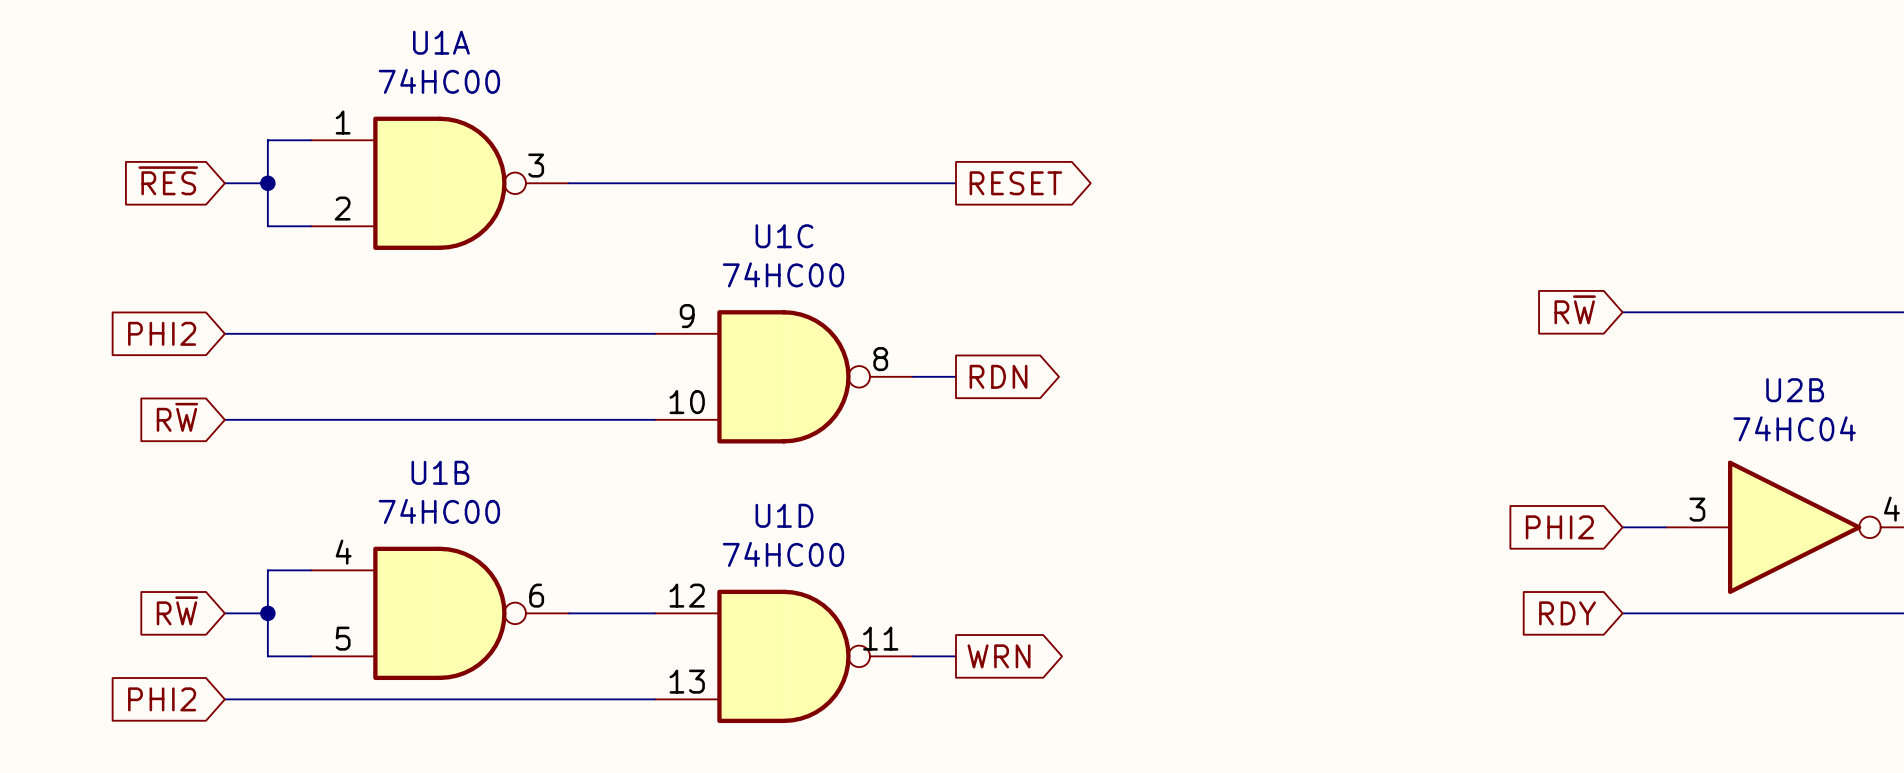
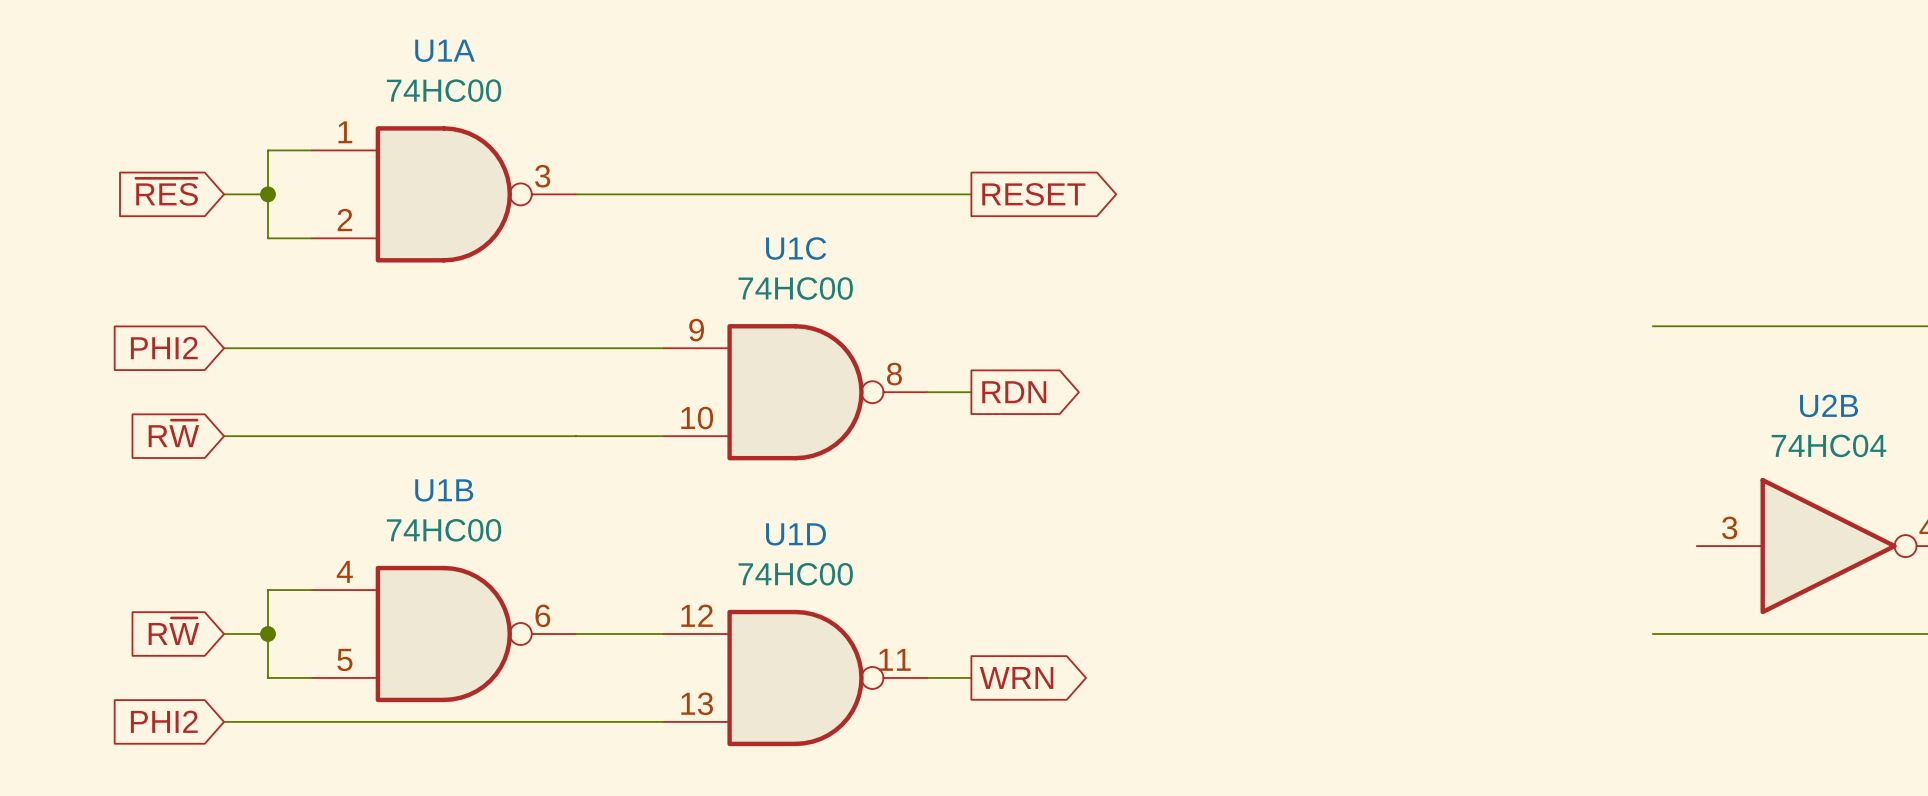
global label: R~{W} (1575, 309) -> none
global label: PHI2 (1559, 527) -> none
wire: (1622, 527) (1665, 527) -> none
global label: RDY (1567, 613) -> none

